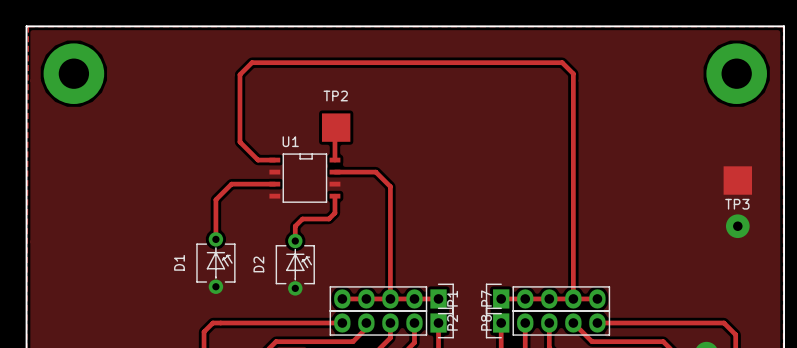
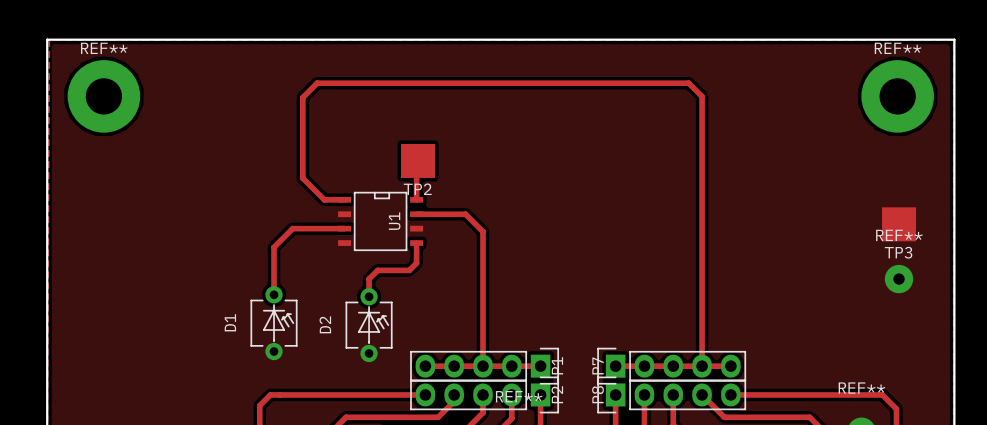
REF** name: none -> REF** (104, 48)
REF** name: none -> REF** (898, 48)
TP2 name position: TP2 (335, 95) -> TP2 (417, 189)
U1 name rotation: 0° (290, 141) -> 90° counterclockwise (394, 221)
U1 name position: U1 (290, 141) -> U1 (394, 221)
REF** name: none -> REF** (899, 235)
REF** name: none -> REF** (861, 388)
REF** name: none -> REF** (519, 396)

